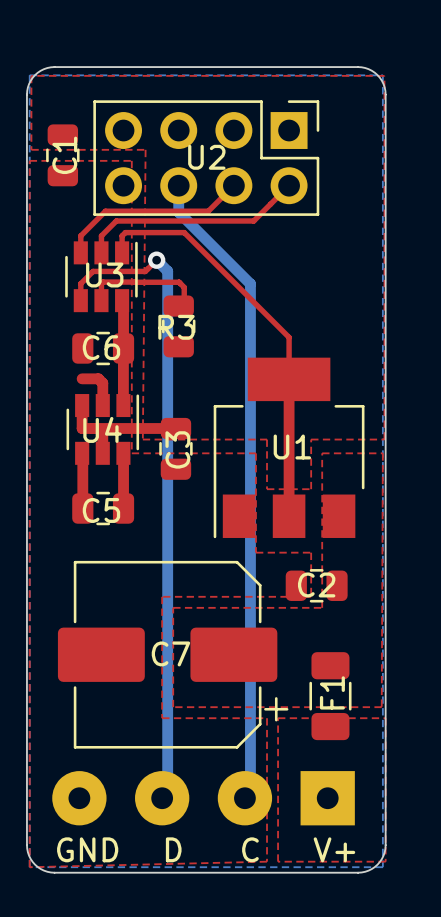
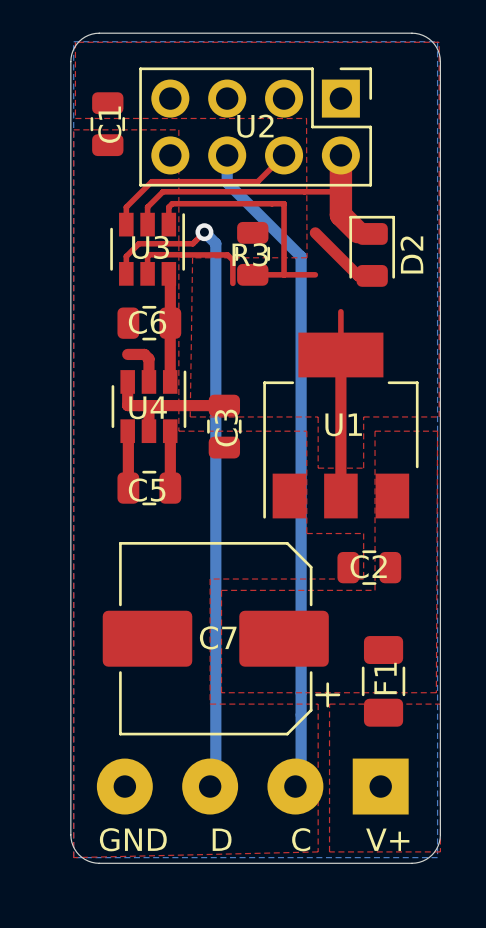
top zone outline: (145, 149) (142, 439) -> (193, 118) (306, 118) (307, 257) (192, 257) (190, 416)
top track: (289, 185) (253, 221) -> (340, 195) (337, 191) (304, 191)
top track: none -> (343, 158) (340, 155) (340, 215) (357, 232)
top track: (184, 232) (289, 337) -> (232, 203) (284, 203) (284, 274)
top track: none -> (315, 232) (358, 275) (372, 275)
D2: none -> (372, 251)
top track: none -> (252, 274) (315, 274)
R3 position: (178, 326) -> (252, 253)

